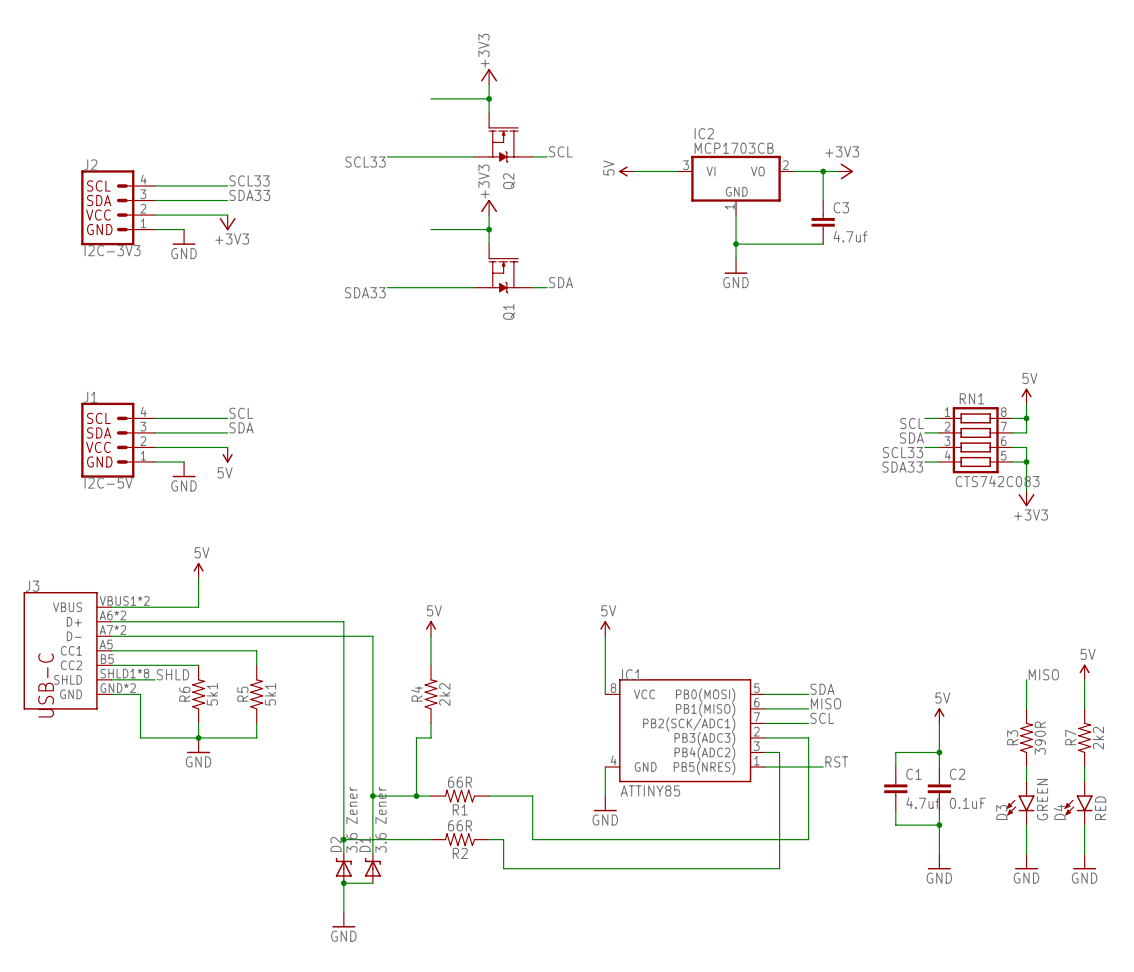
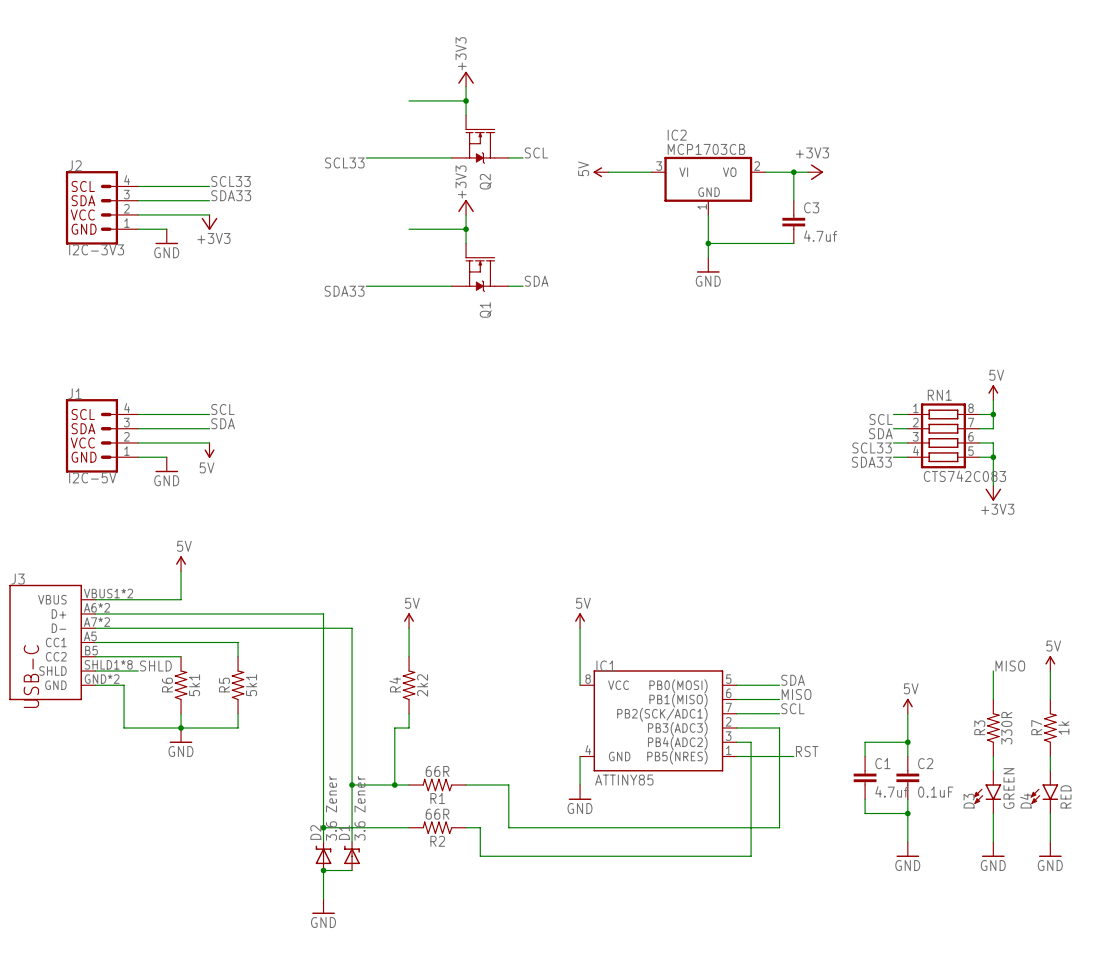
R3 value: 390R (1040, 738) -> 330R (1006, 728)
R7 value: 2k2 (1098, 738) -> 1k (1063, 728)

